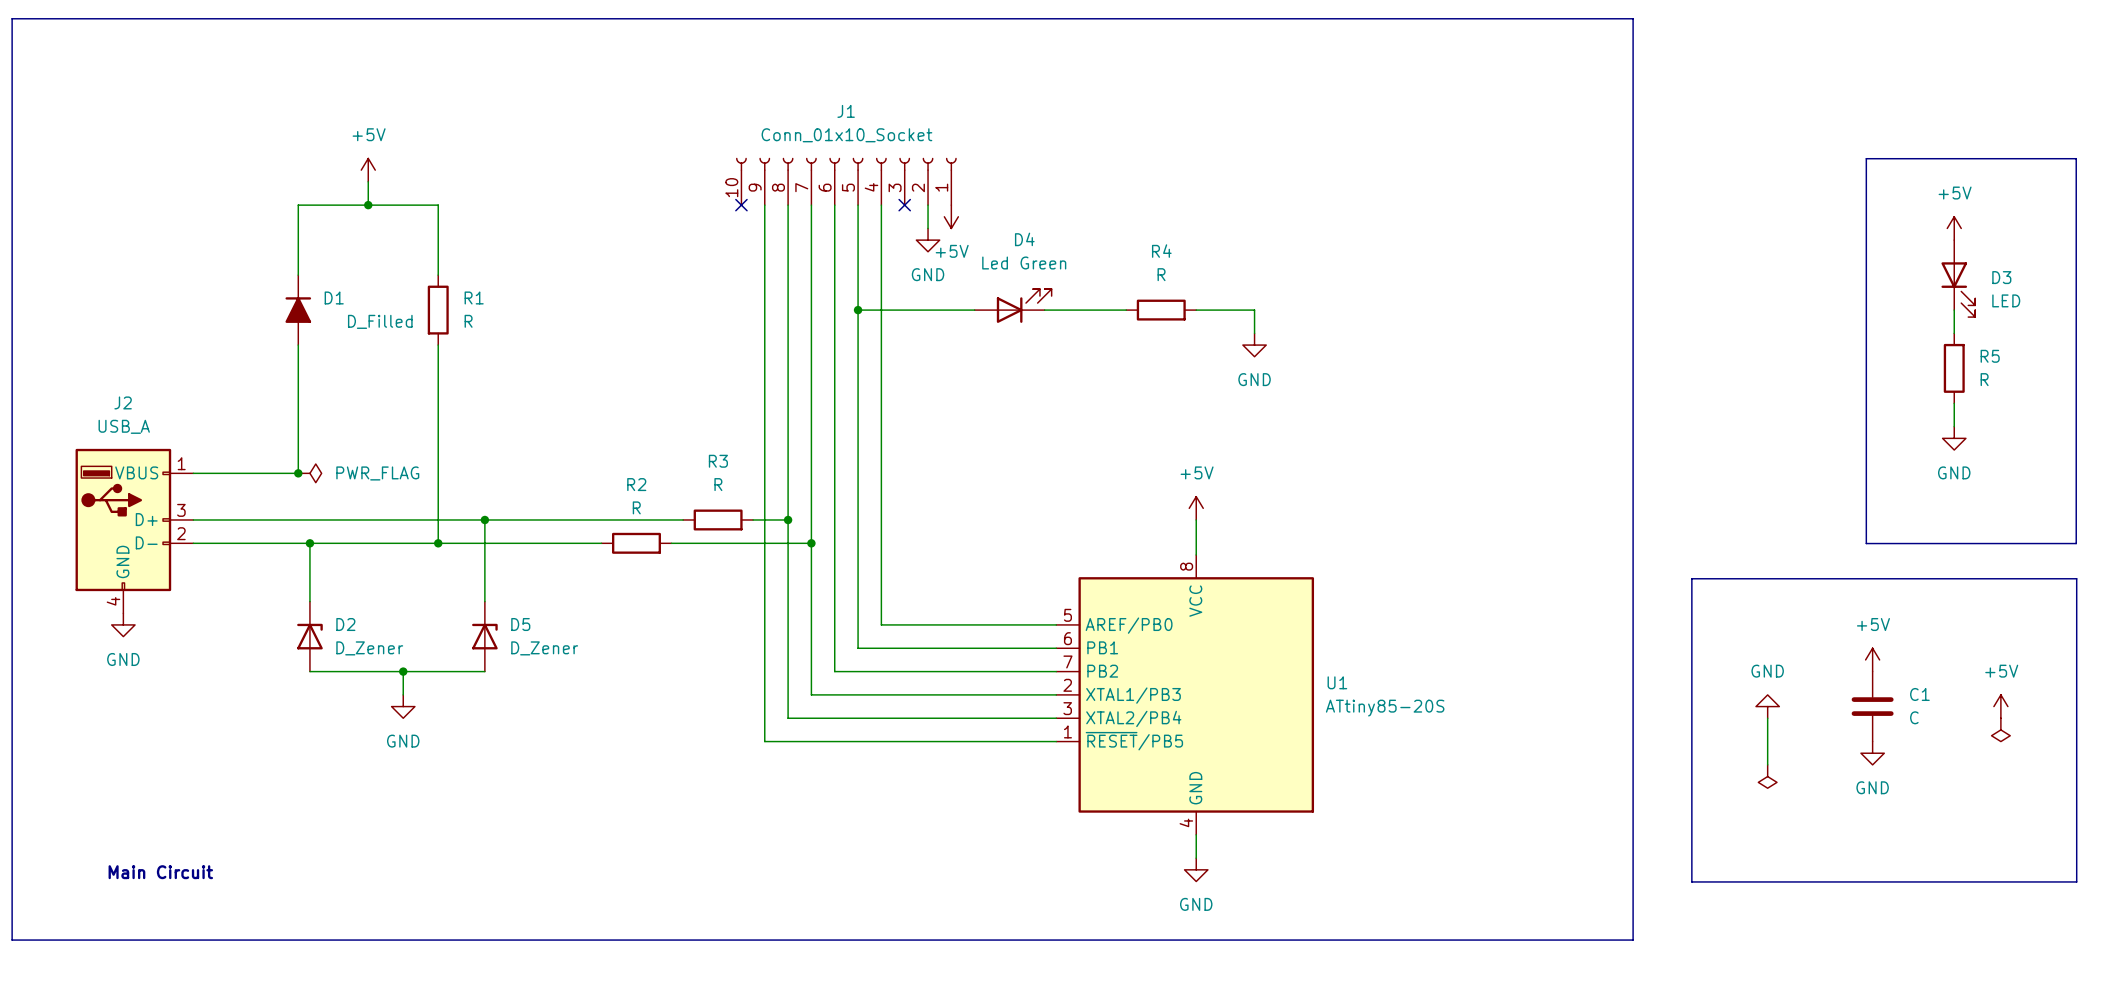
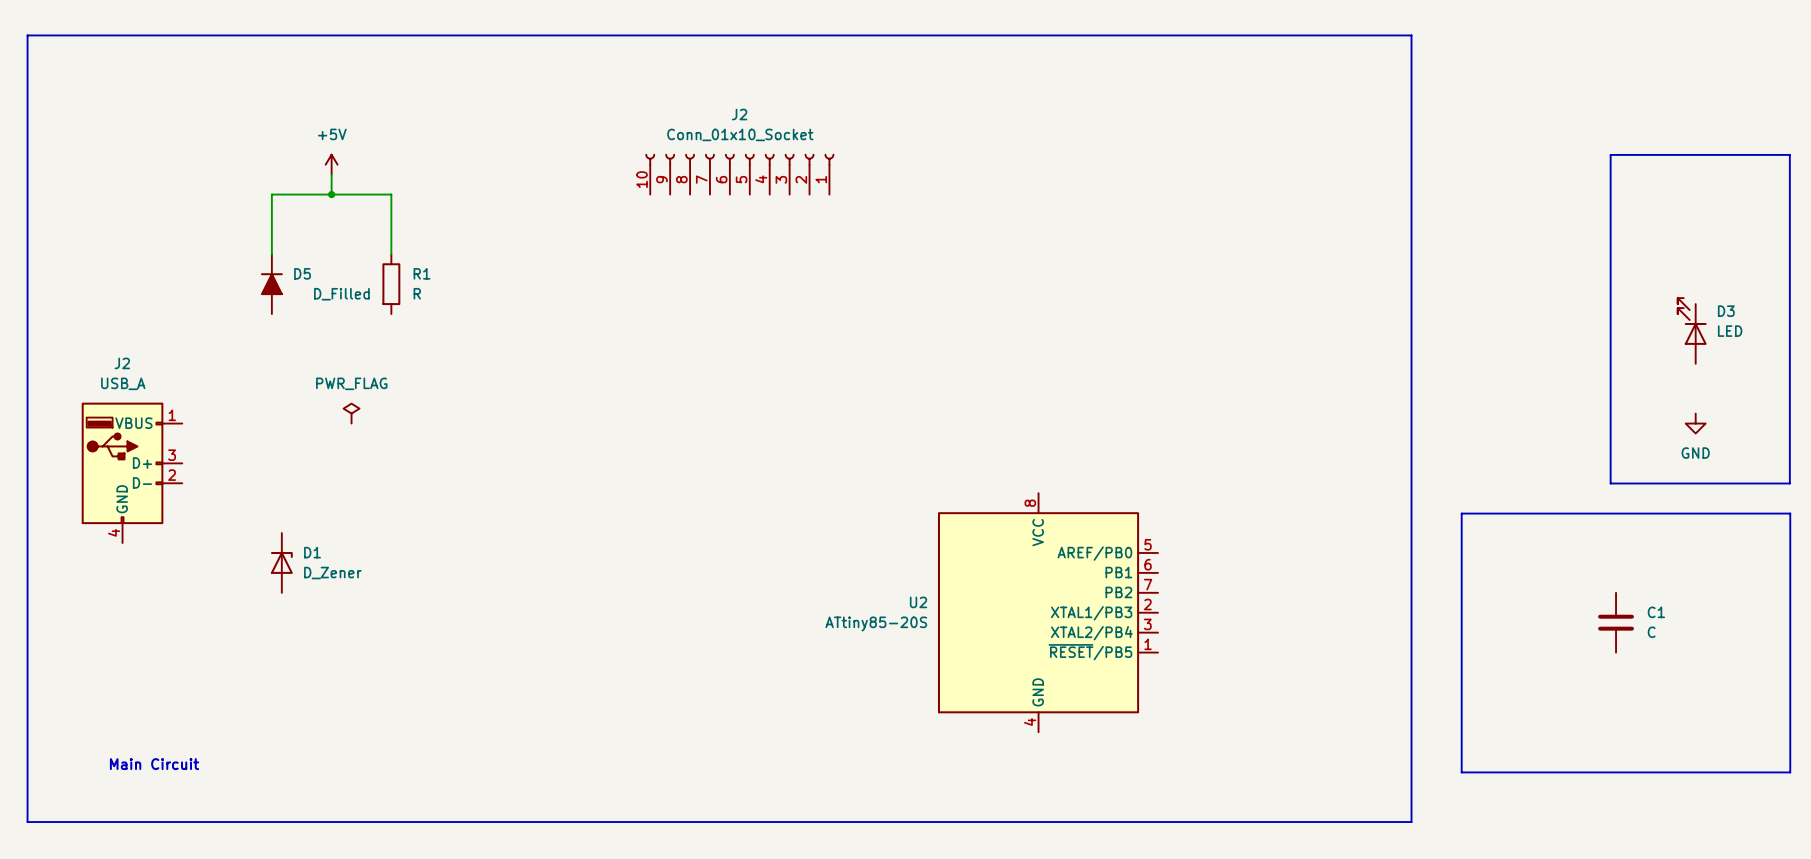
J1 name: J1 (846, 111) -> J2 (739, 114)
no-connect mark: (741, 205) -> none
wire: (764, 205) (764, 741) (1056, 741) -> none
wire: (788, 205) (788, 718) (1056, 718) -> none
wire: (811, 205) (811, 694) (1056, 694) -> none
wire: (834, 205) (834, 671) (1056, 671) -> none
wire: (858, 205) (858, 648) (1056, 648) -> none
wire: (881, 205) (881, 624) (1056, 624) -> none
no-connect mark: (904, 205) -> none
wire: (928, 205) (928, 228) -> none
power symbol: +5V (951, 216) -> none
power symbol: +5V (1954, 228) -> none
power symbol: GND (928, 240) -> none
D3 name position: D3 (2001, 277) -> D3 (1726, 311)
D3 position: (1958, 278) -> (1692, 330)
D3 rotation: 0° (1958, 289) -> 180° (1692, 321)
D1 name: D1 (334, 297) -> D5 (302, 273)
D3 value position: LED (2006, 300) -> LED (1730, 331)
D4: Led Green (1013, 306) -> none
wire: (858, 310) (974, 310) -> none
junction: (858, 310) -> none
wire: (1044, 310) (1126, 310) -> none
R4: R (1161, 310) -> none
wire: (1196, 310) (1254, 310) (1254, 333) -> none
wire: (1954, 310) (1954, 333) -> none
wire: (298, 345) (298, 473) (193, 473) -> none
wire: (438, 345) (438, 543) -> none
power symbol: GND (1254, 345) -> none
R5: R (1954, 368) -> none
wire: (1954, 403) (1954, 426) -> none
power symbol position: GND (1954, 438) -> GND (1695, 423)
junction: (298, 473) -> none
power symbol rotation: 0° (309, 473) -> 90° counterclockwise (351, 413)
power symbol position: PWR_FLAG (309, 473) -> PWR_FLAG (351, 413)
power symbol text position: PWR_FLAG (377, 473) -> PWR_FLAG (351, 383)
power symbol: +5V (1196, 508) -> none
wire: (193, 519) (683, 519) -> none
wire: (484, 519) (484, 601) -> none
junction: (484, 519) -> none
R3: R (718, 519) -> none
wire: (753, 519) (788, 519) -> none
junction: (788, 519) -> none
wire: (1196, 519) (1196, 554) -> none
wire: (193, 543) (601, 543) -> none
wire: (309, 543) (309, 601) -> none
junction: (309, 543) -> none
junction: (438, 543) -> none
R2: R (636, 543) -> none
wire: (671, 543) (811, 543) -> none
junction: (811, 543) -> none
power symbol: GND (123, 624) -> none
D2 name: D2 (345, 624) -> D1 (312, 552)
D5: D_Zener (484, 636) -> none
power symbol: +5V (1872, 659) -> none
wire: (309, 671) (484, 671) -> none
wire: (403, 671) (403, 694) -> none
junction: (403, 671) -> none
U1: ATtiny85-20S (1185, 694) -> none
U2: none -> ATtiny85-20S (1048, 612)
power symbol: GND (403, 706) -> none
power symbol: GND (1767, 706) -> none
power symbol: +5V (2000, 706) -> none
wire: (1767, 718) (1767, 764) -> none
power symbol: (2000, 729) -> none
power symbol: GND (1872, 753) -> none
power symbol: (1767, 776) -> none
wire: (1196, 834) (1196, 858) -> none
power symbol: GND (1196, 869) -> none

